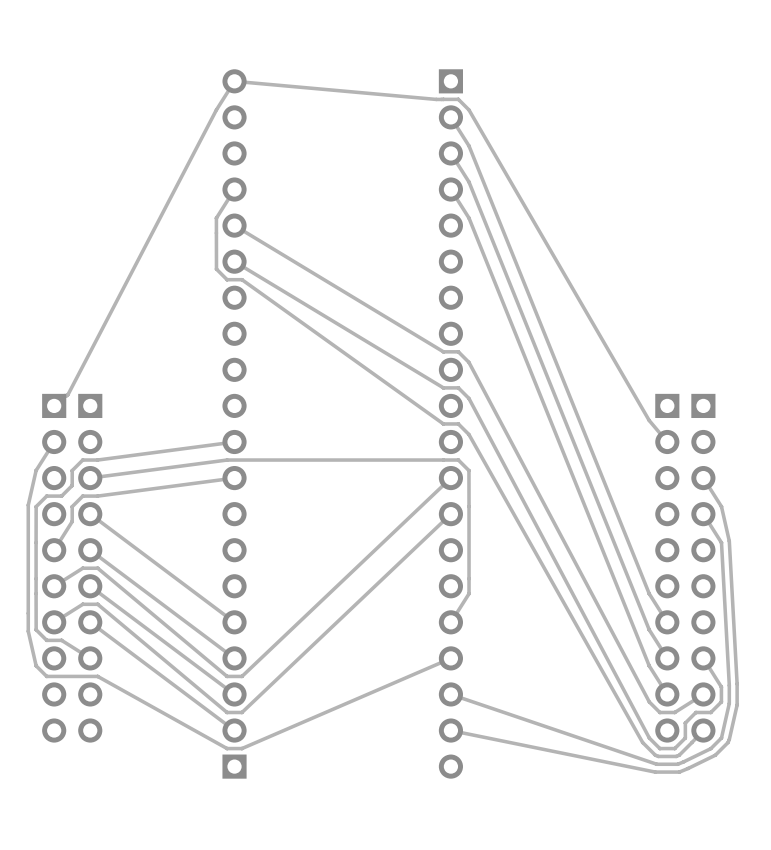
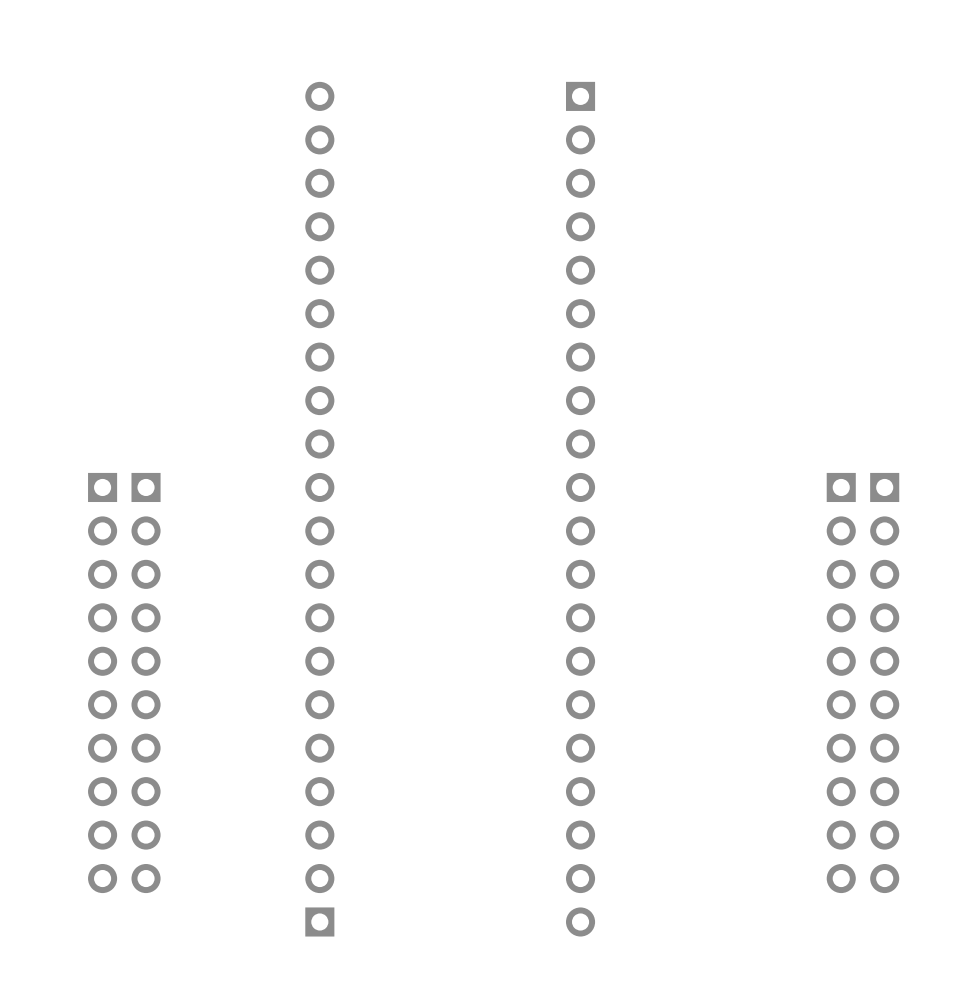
track: (458, 99) (468, 109) (649, 420) (667, 442) -> none
track: (458, 99) (436, 99) (234, 81) (216, 109) (68, 394) (54, 405) -> none
track: (450, 117) (469, 145) -> none
track: (469, 146) (649, 593) -> none
track: (450, 153) (469, 182) -> none
track: (469, 182) (649, 629) -> none
track: (234, 189) (216, 218) -> none
track: (450, 189) (469, 218) -> none
track: (216, 218) (216, 269) -> none
track: (469, 218) (649, 665) -> none
track: (234, 225) (443, 351) -> none
track: (234, 261) (443, 387) -> none
track: (216, 269) (227, 279) -> none
track: (241, 279) (227, 279) -> none
track: (242, 279) (443, 423) -> none
track: (458, 351) (468, 362) (649, 701) (659, 712) -> none
track: (458, 351) (443, 351) -> none
track: (458, 387) (468, 398) (649, 738) (659, 748) -> none
track: (458, 387) (443, 387) -> none
track: (458, 423) (468, 434) (642, 742) (655, 755) (676, 756) (703, 730) -> none
track: (458, 423) (443, 423) -> none
track: (54, 442) (36, 470) -> none
track: (234, 442) (97, 460) (82, 460) -> none
track: (82, 460) (72, 470) -> none
track: (458, 460) (468, 470) -> none
track: (458, 460) (227, 460) (90, 478) -> none
track: (36, 470) (28, 505) (28, 631) (36, 665) -> none
track: (72, 470) (72, 485) -> none
track: (468, 470) (469, 593) -> none
track: (234, 478) (97, 496) (82, 496) -> none
track: (450, 478) (242, 676) -> none
track: (703, 478) (721, 506) -> none
track: (72, 485) (61, 496) -> none
track: (46, 496) (36, 506) -> none
track: (61, 496) (46, 496) -> none
track: (82, 496) (72, 506) -> none
track: (36, 506) (36, 629) -> none
track: (72, 506) (72, 521) -> none
track: (721, 506) (729, 541) (737, 705) (728, 742) (715, 755) (679, 772) (655, 772) (450, 730) -> none
track: (90, 514) (234, 622) -> none
track: (450, 514) (242, 712) -> none
track: (703, 514) (721, 542) -> none
track: (72, 521) (54, 550) -> none
track: (721, 542) (729, 685) (729, 703) (721, 737) -> none
track: (90, 550) (234, 658) -> none
track: (82, 568) (54, 586) -> none
track: (97, 568) (227, 676) -> none
track: (97, 568) (82, 568) -> none
track: (90, 586) (234, 694) -> none
track: (469, 593) (450, 622) -> none
track: (649, 593) (667, 622) -> none
track: (82, 604) (54, 622) -> none
track: (97, 604) (227, 712) -> none
track: (97, 604) (82, 604) -> none
track: (90, 622) (234, 730) -> none
track: (36, 629) (46, 640) -> none
track: (649, 629) (667, 658) -> none
track: (61, 640) (90, 658) -> none
track: (61, 640) (46, 640) -> none
track: (450, 658) (242, 748) -> none
track: (703, 658) (721, 686) -> none
track: (36, 665) (46, 676) -> none
track: (649, 665) (667, 694) -> none
track: (97, 676) (227, 748) -> none
track: (97, 676) (46, 676) -> none
track: (241, 676) (227, 676) -> none
track: (721, 687) (721, 701) -> none
track: (450, 694) (656, 764) (677, 764) (710, 748) (721, 738) -> none
track: (703, 694) (674, 712) -> none
track: (721, 701) (710, 712) -> none
track: (241, 712) (227, 712) -> none
track: (674, 712) (659, 712) -> none
track: (695, 712) (685, 723) -> none
track: (710, 712) (695, 712) -> none
track: (685, 723) (685, 737) -> none
track: (685, 738) (674, 748) -> none
track: (241, 748) (227, 748) -> none
track: (674, 748) (659, 748) -> none

